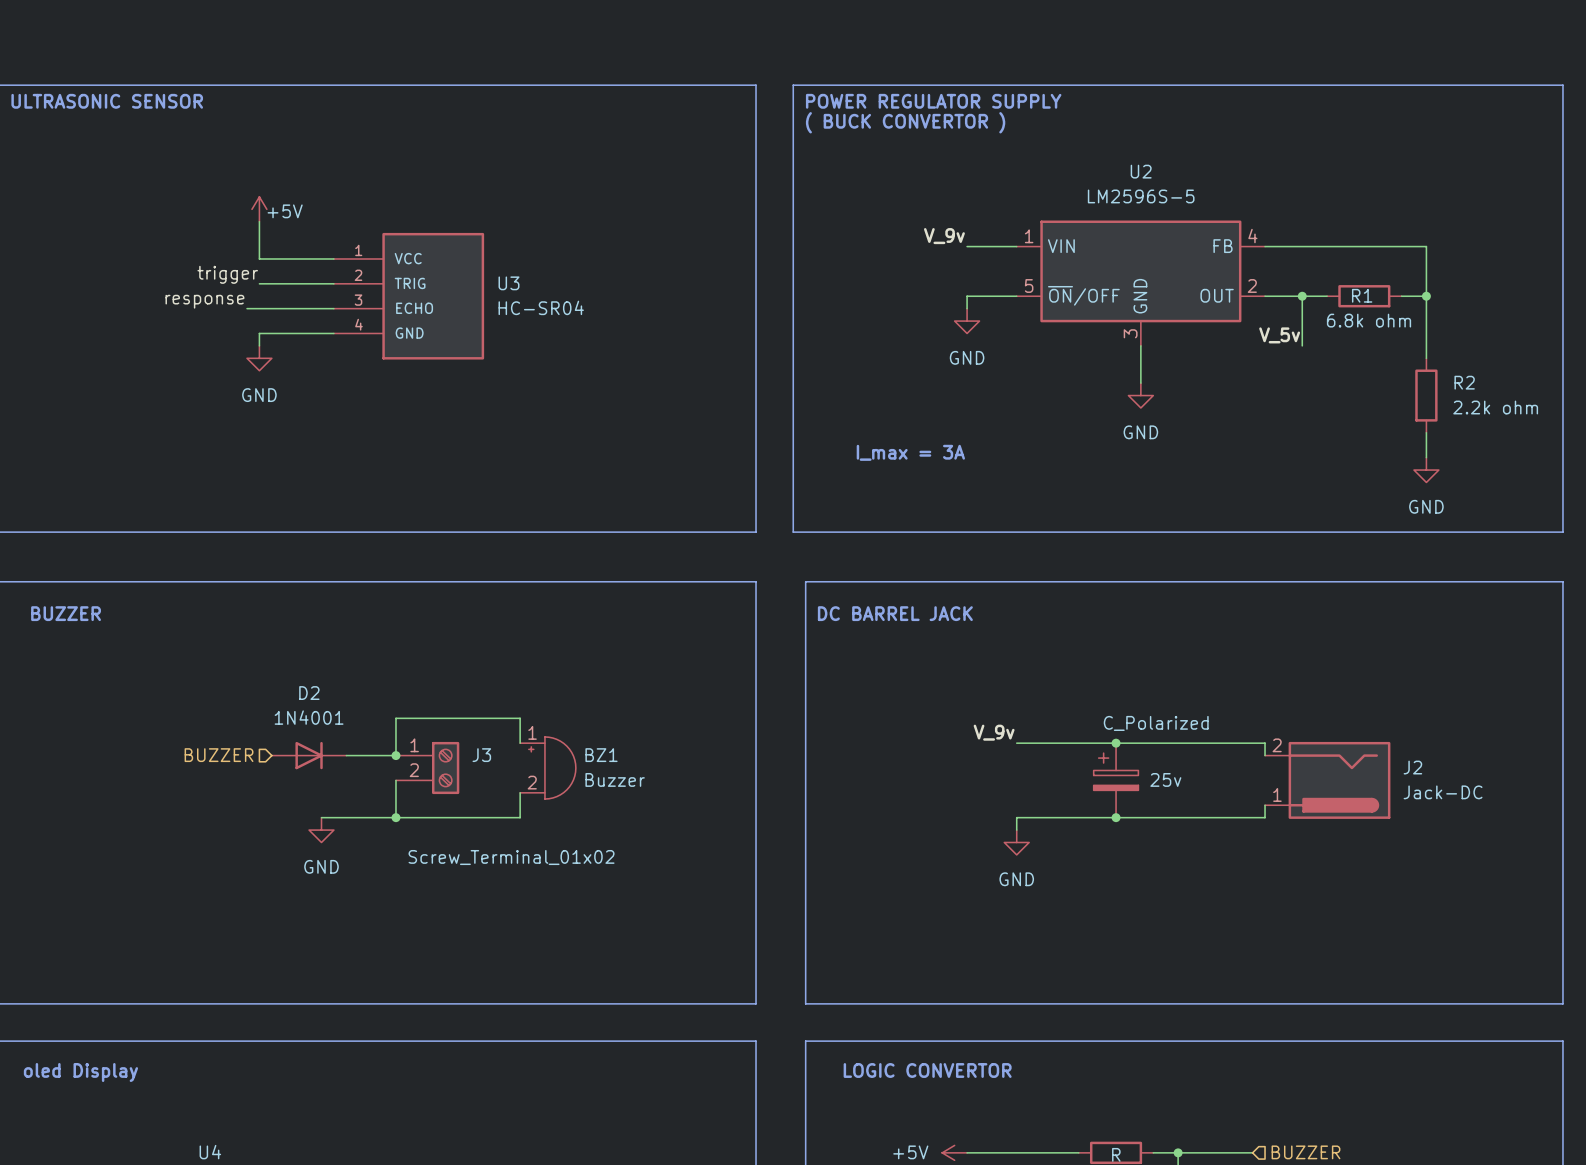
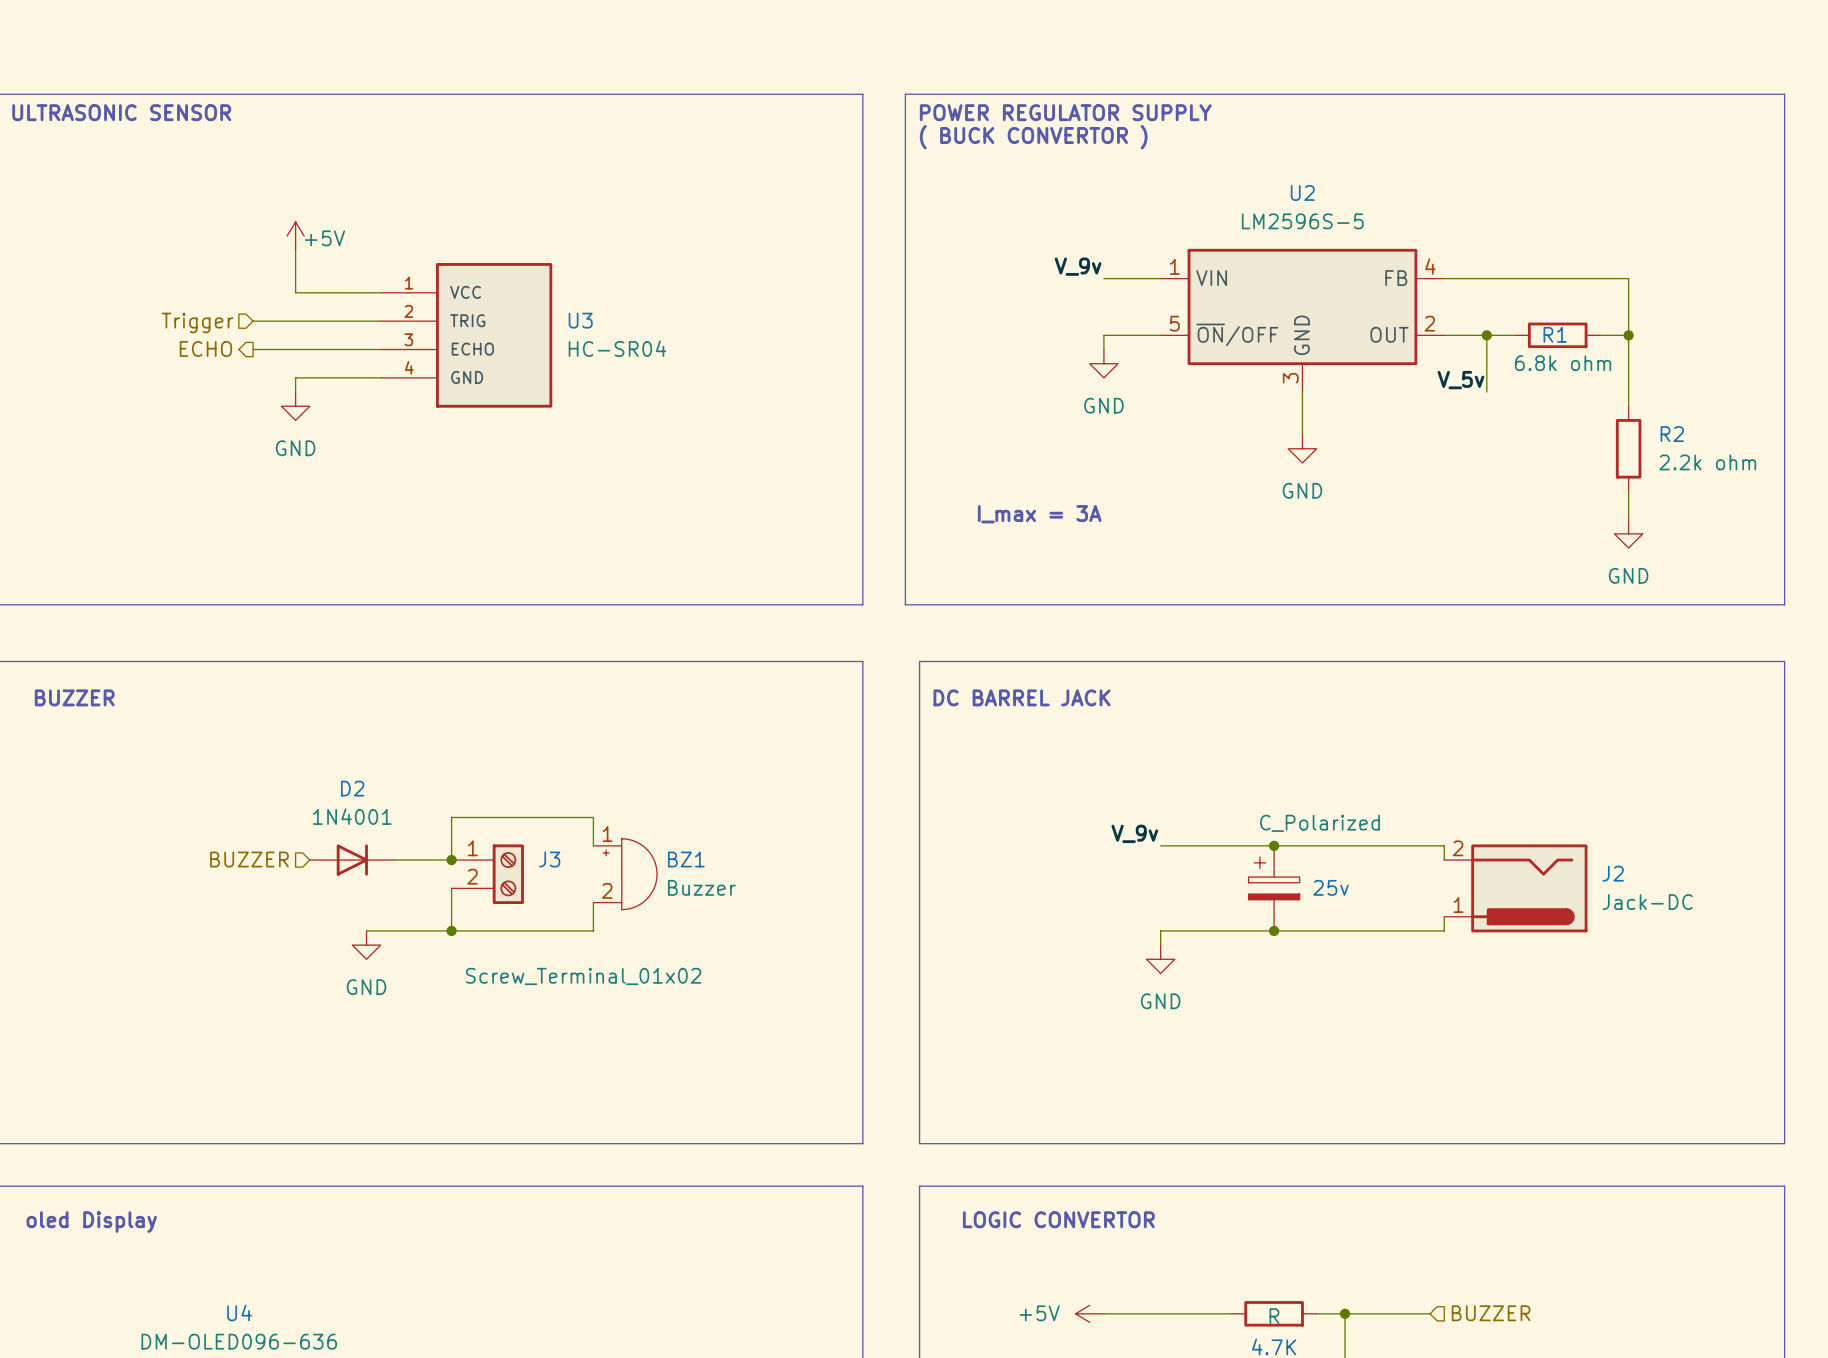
label: trigger (227, 274) -> none
wire: none -> (253, 321) (295, 321)
hierarchical label: none -> Trigger (197, 322)
label: response (204, 301) -> none
hierarchical label: none -> ECHO (205, 348)
wire: none -> (253, 349) (281, 349)

